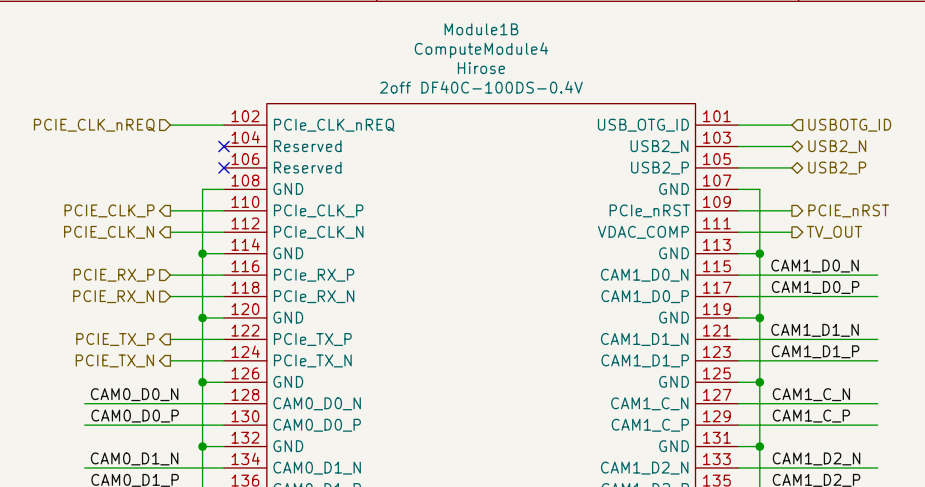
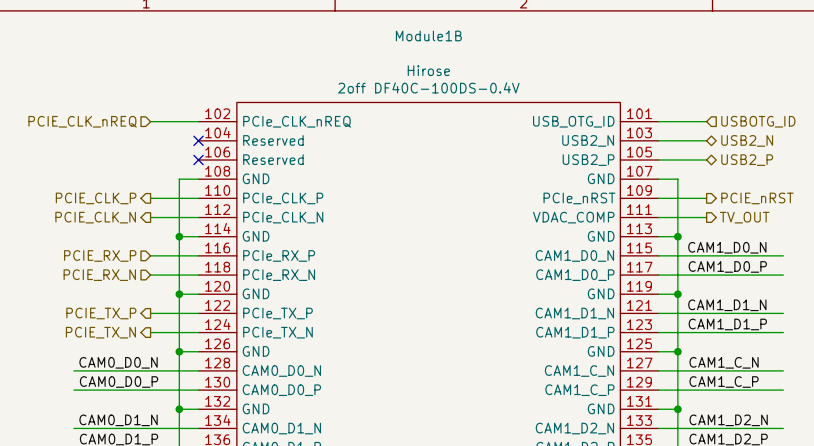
Module1B value: ComputeModule4 (481, 50) -> none

